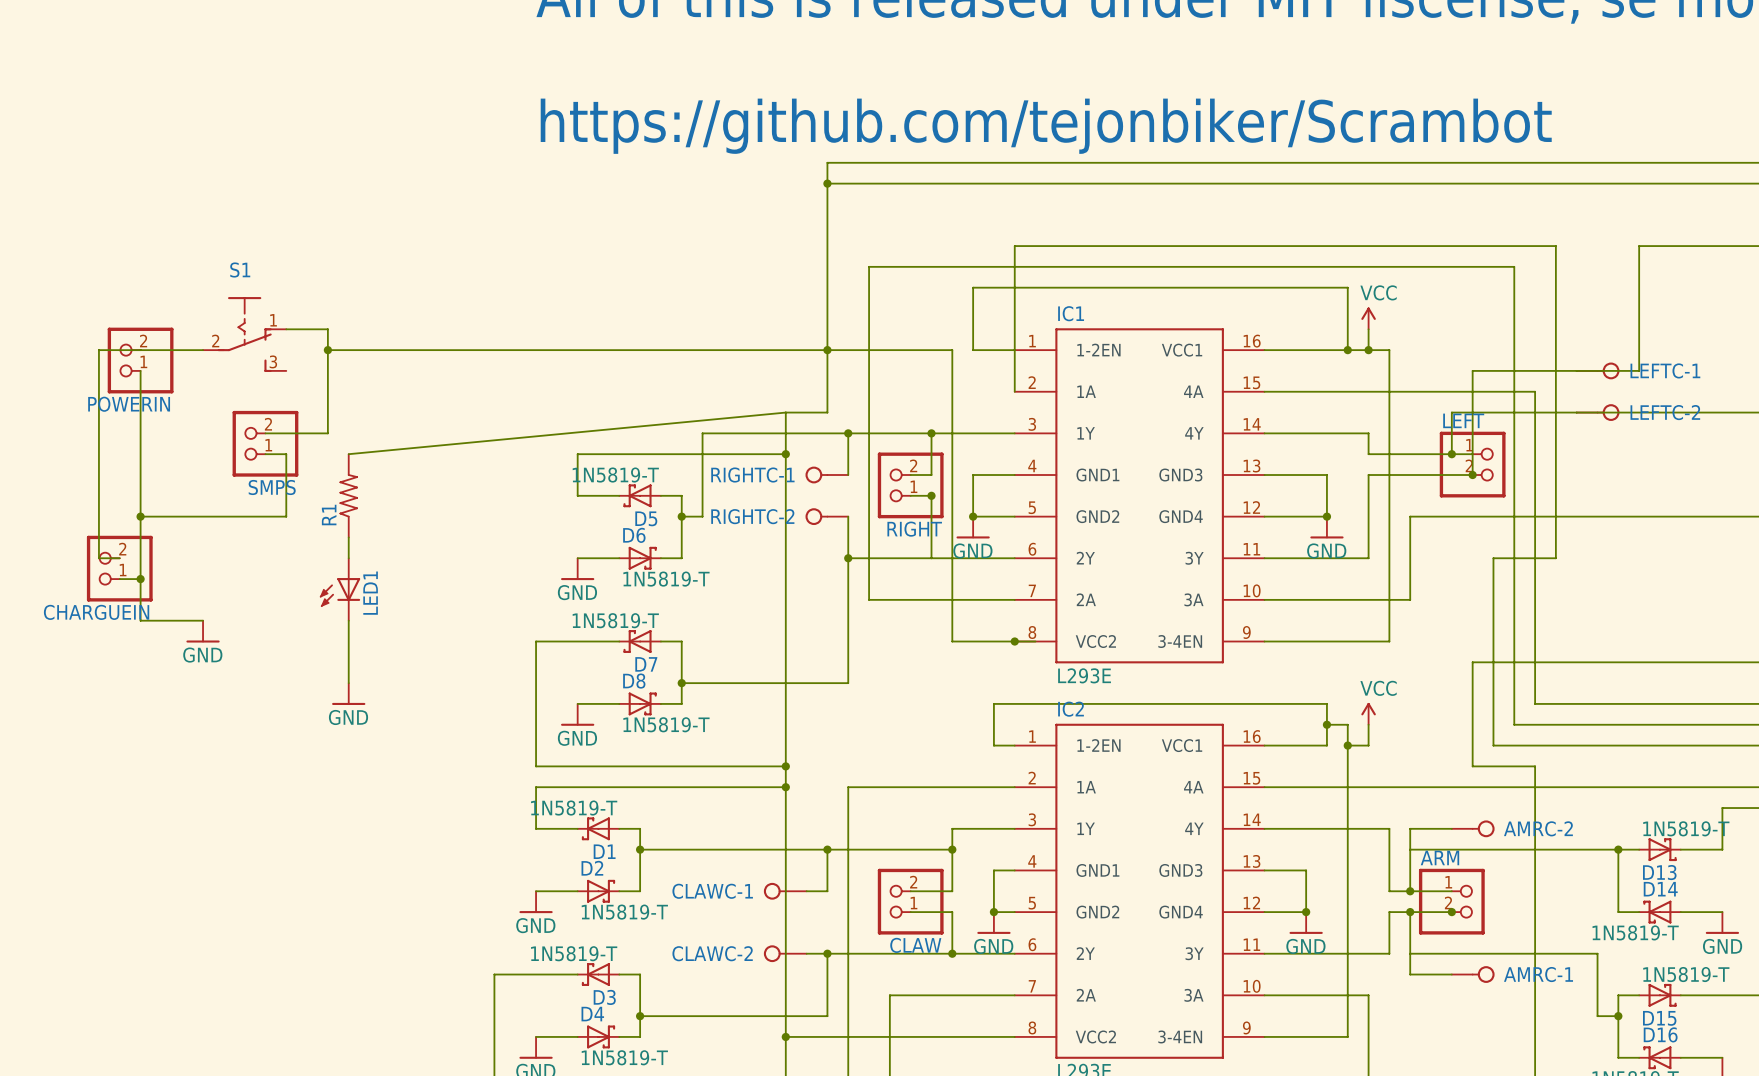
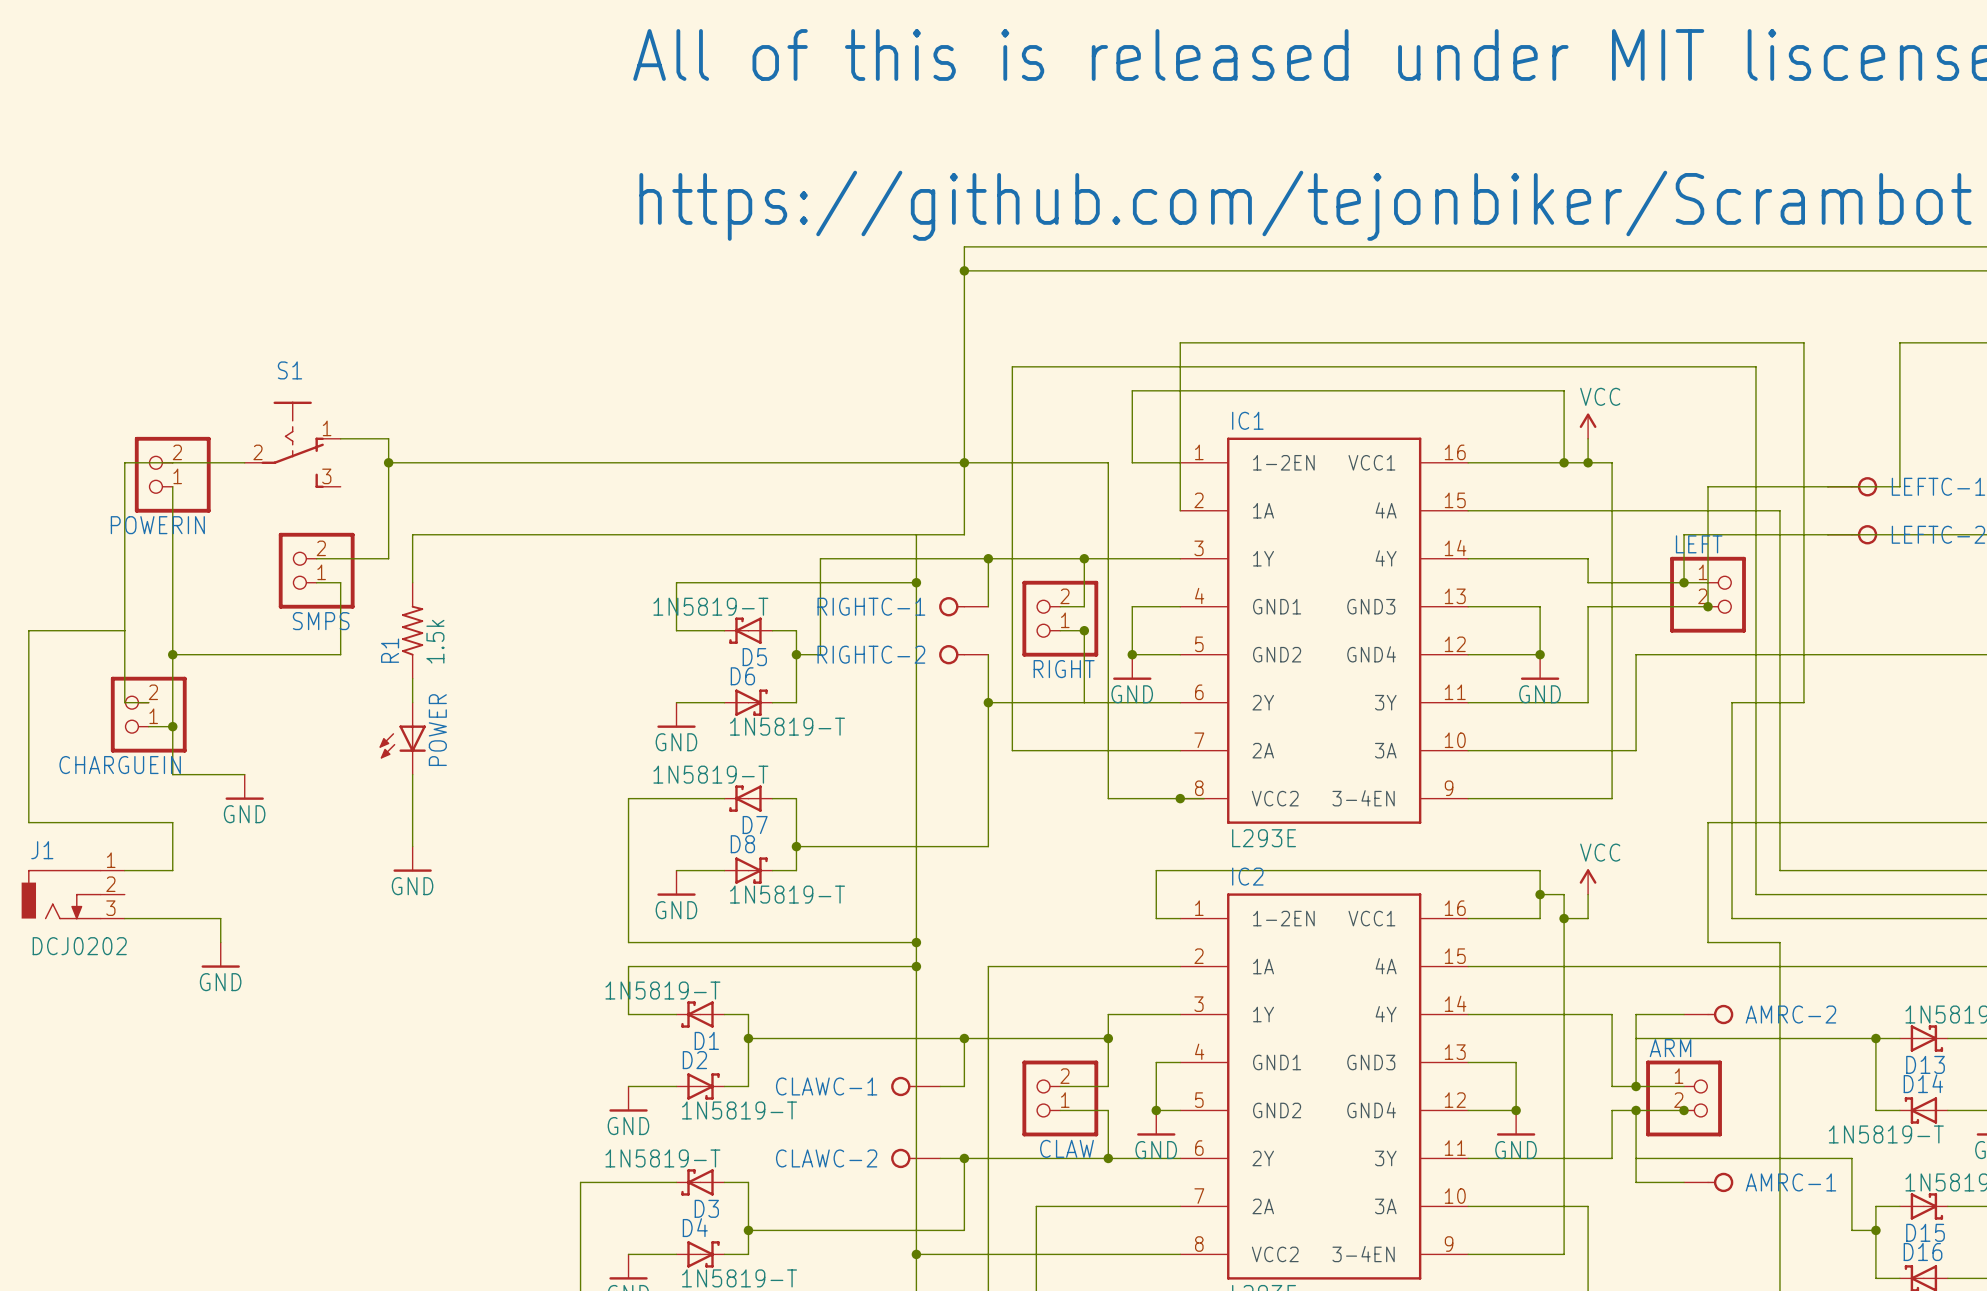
wire: (785, 412) (348, 454) -> (916, 534) (412, 534) (412, 582)
wire: none -> (124, 630) (28, 630) (28, 822) (172, 822) (172, 870) (124, 870)
R1 value: none -> 1.5k (435, 641)
LED1 name: LED1 (370, 593) -> POWER (437, 730)
J1: none -> DCJ0202 (73, 894)
wire: none -> (124, 918) (220, 918) (220, 942)
power symbol: none -> GND (220, 955)

